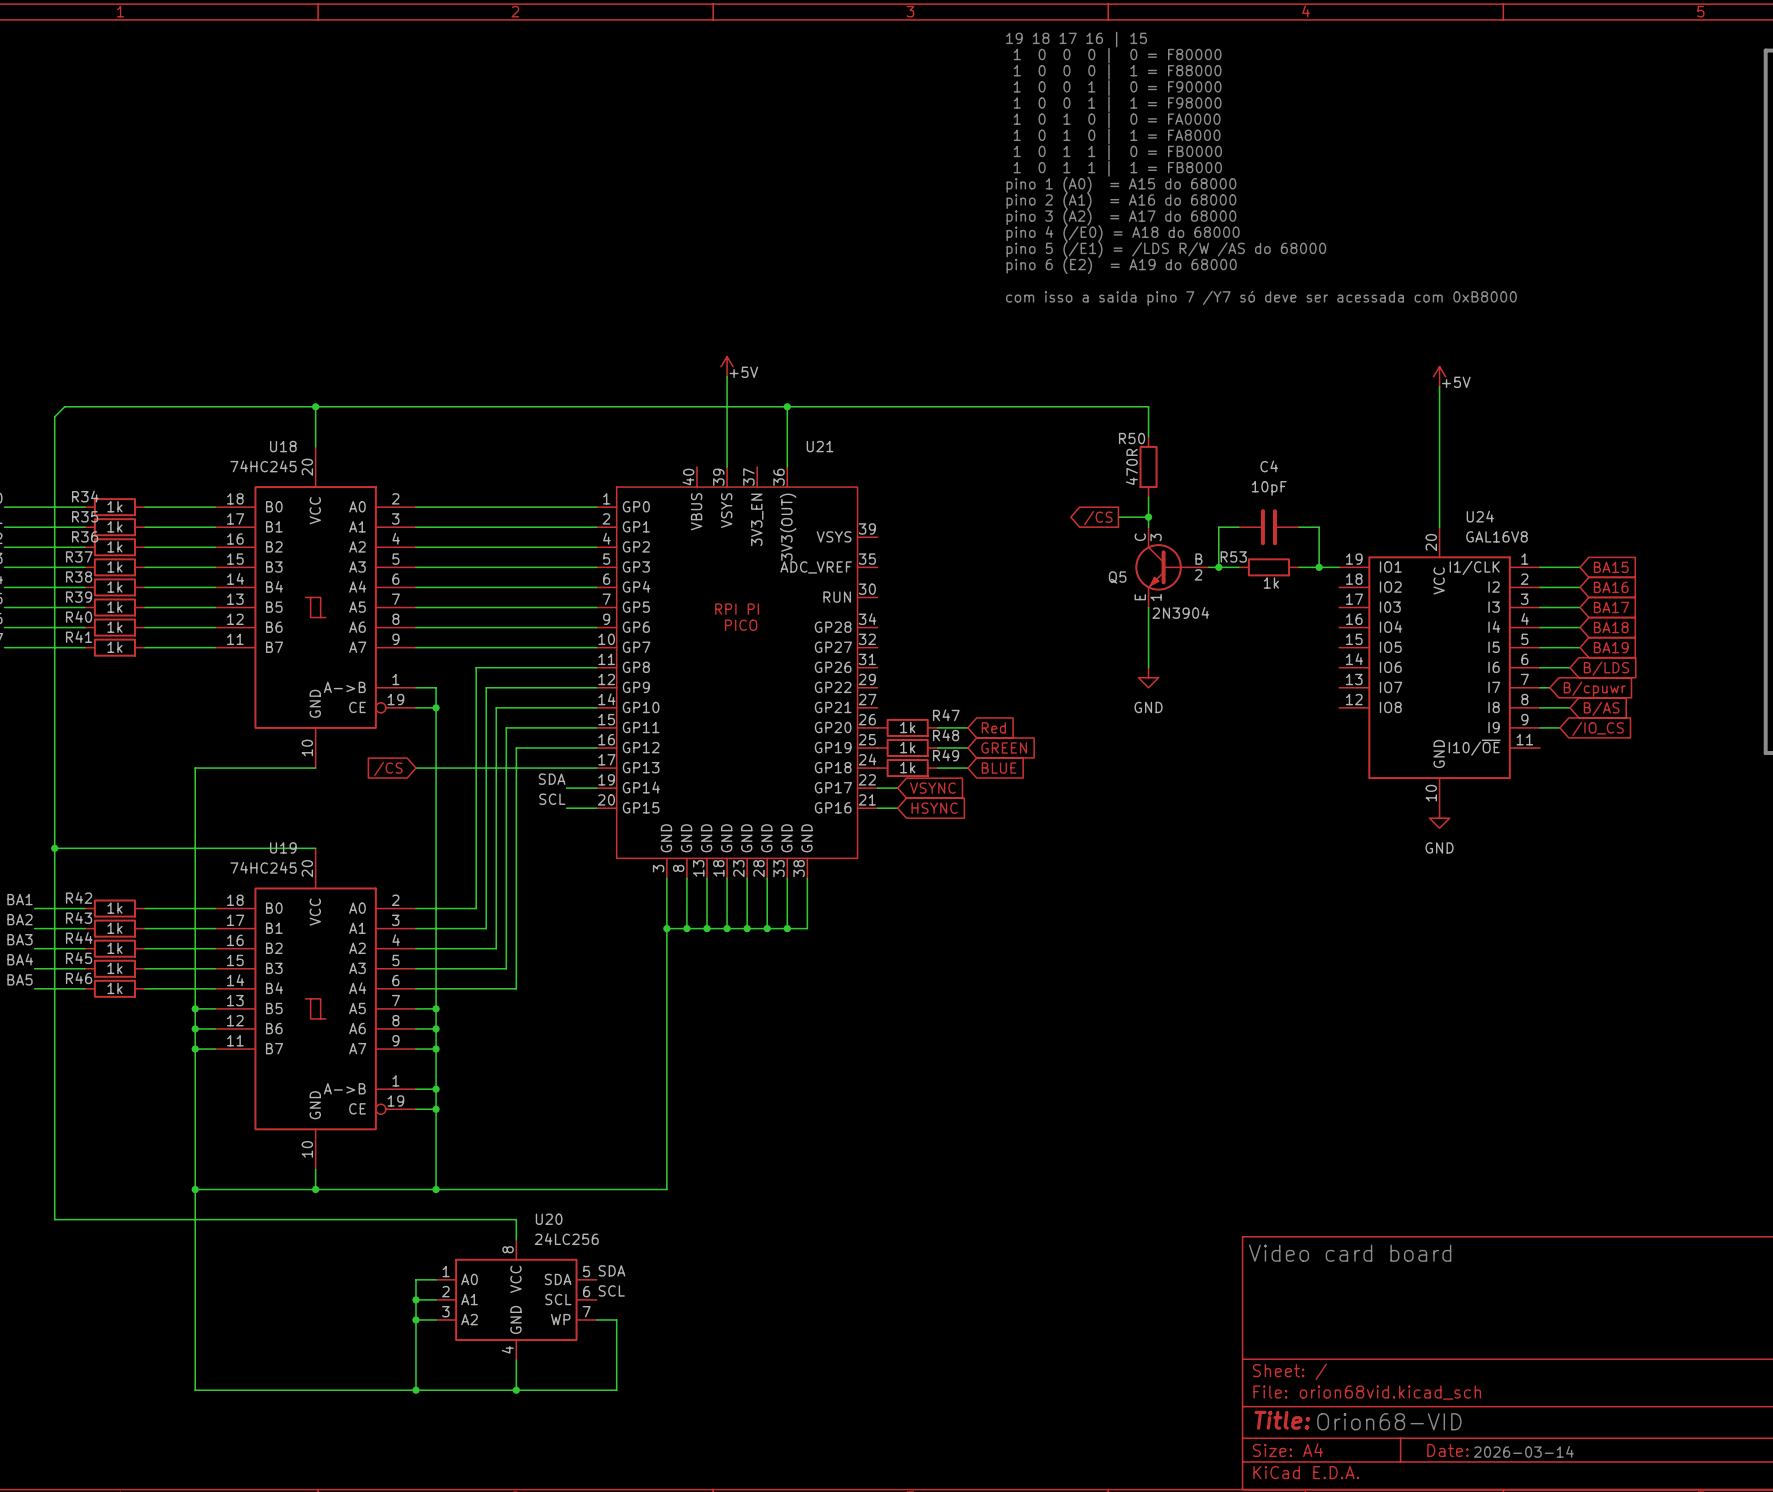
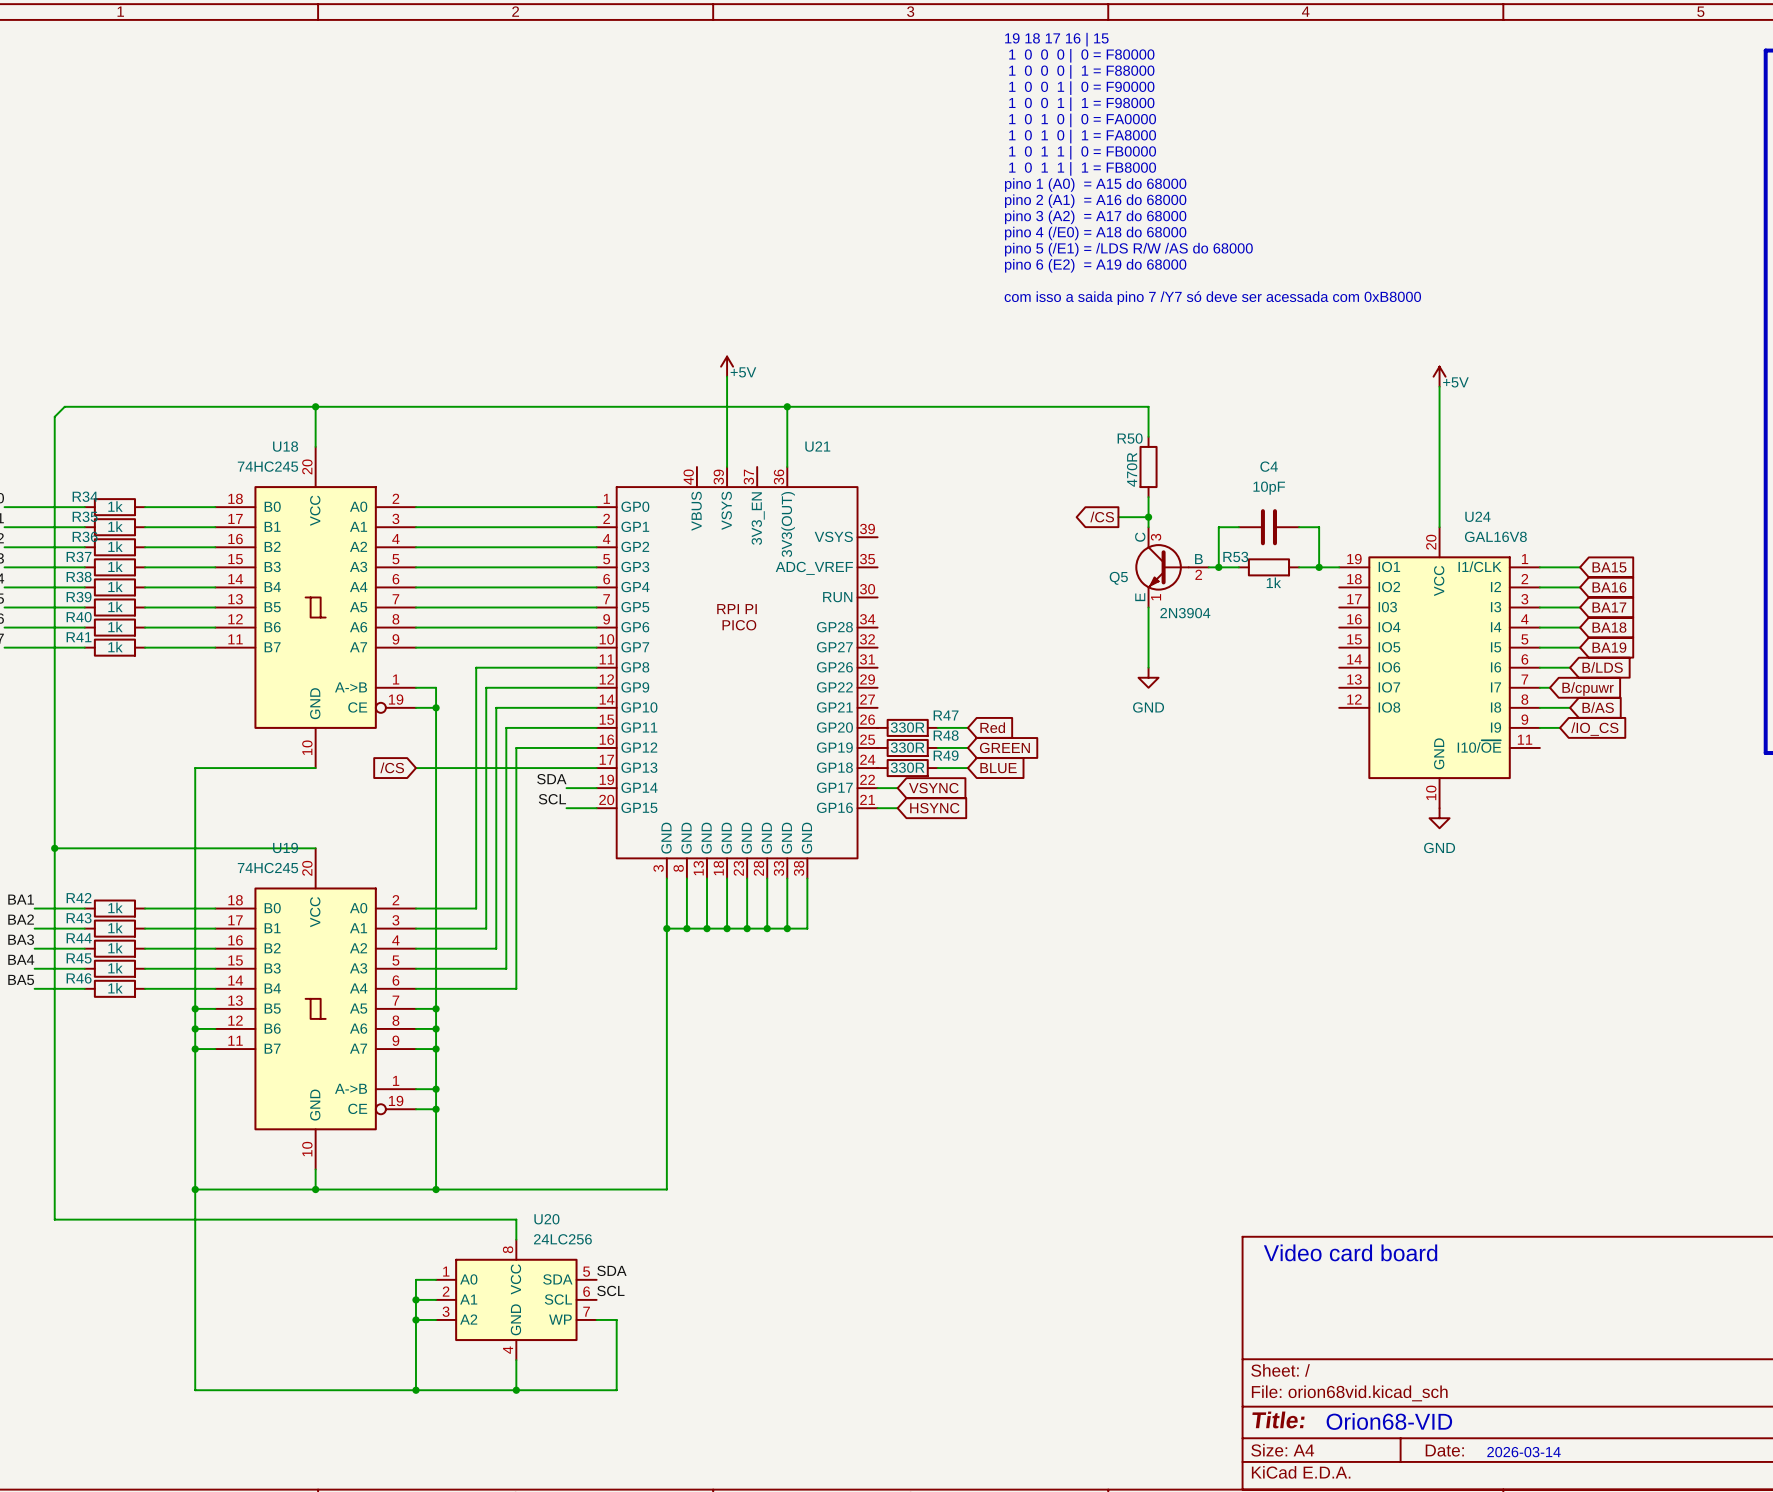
R47 value: 1k (907, 727) -> 330R (907, 727)
R48 value: 1k (907, 747) -> 330R (907, 747)
R49 value: 1k (907, 767) -> 330R (907, 767)

